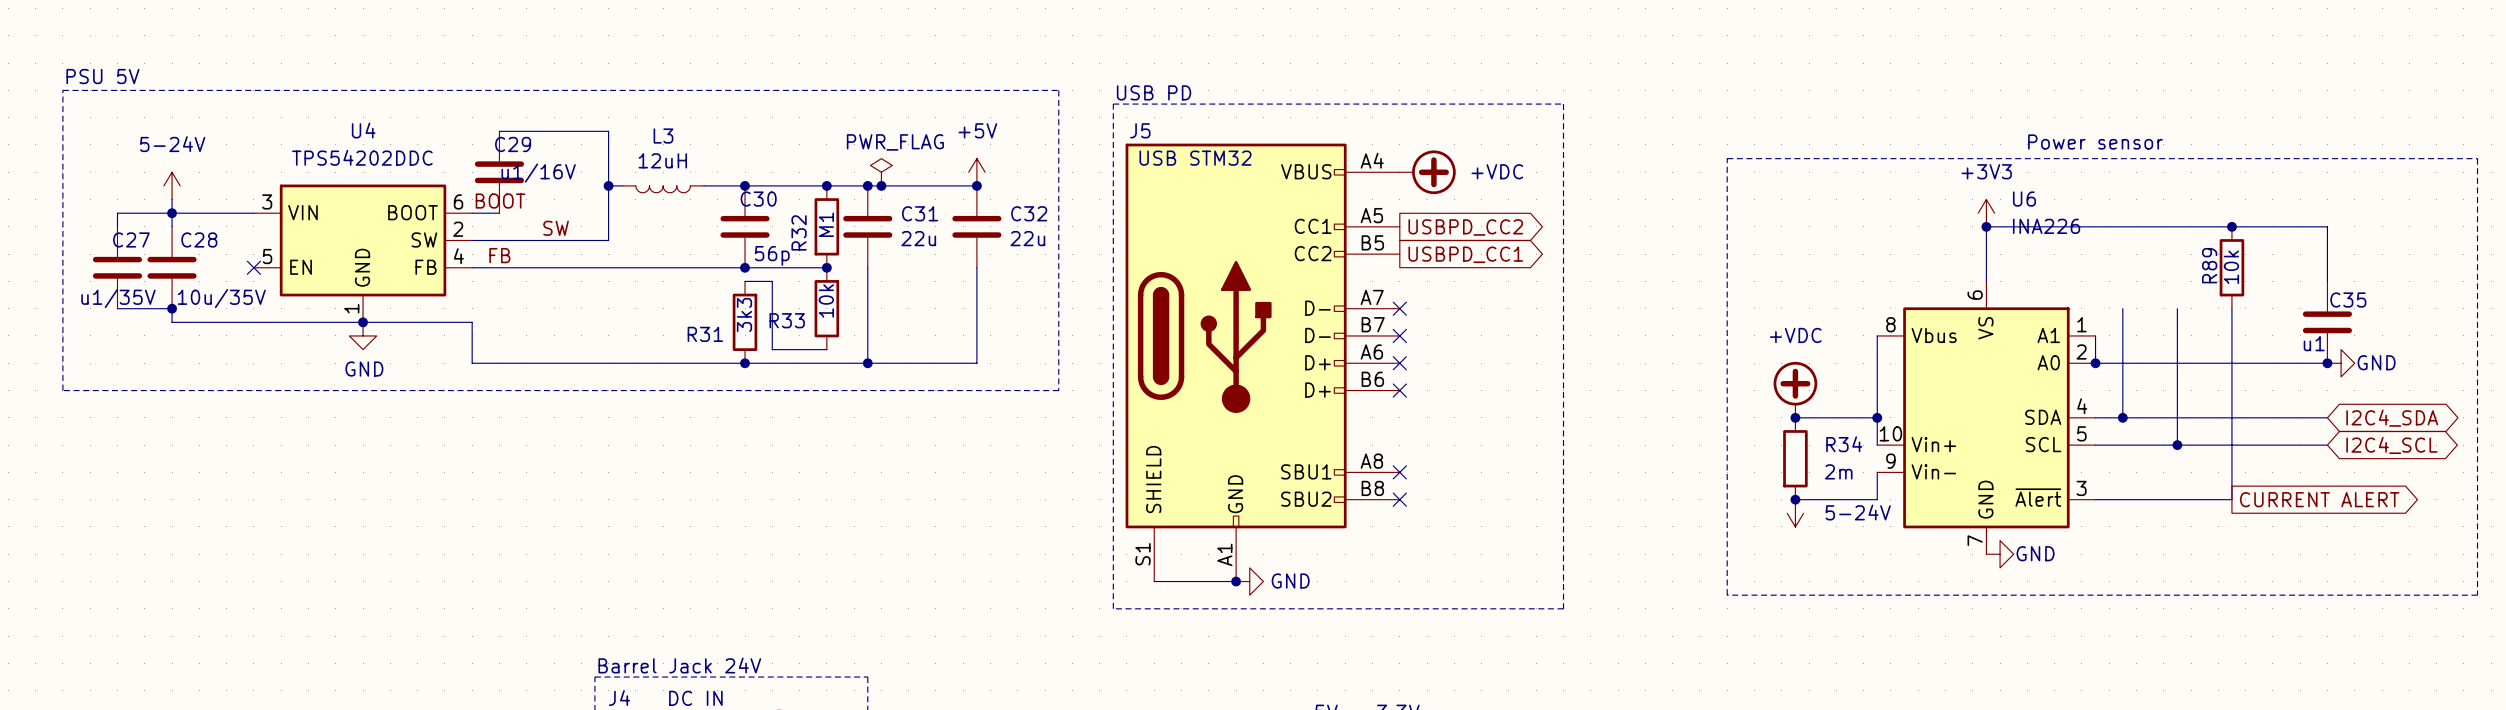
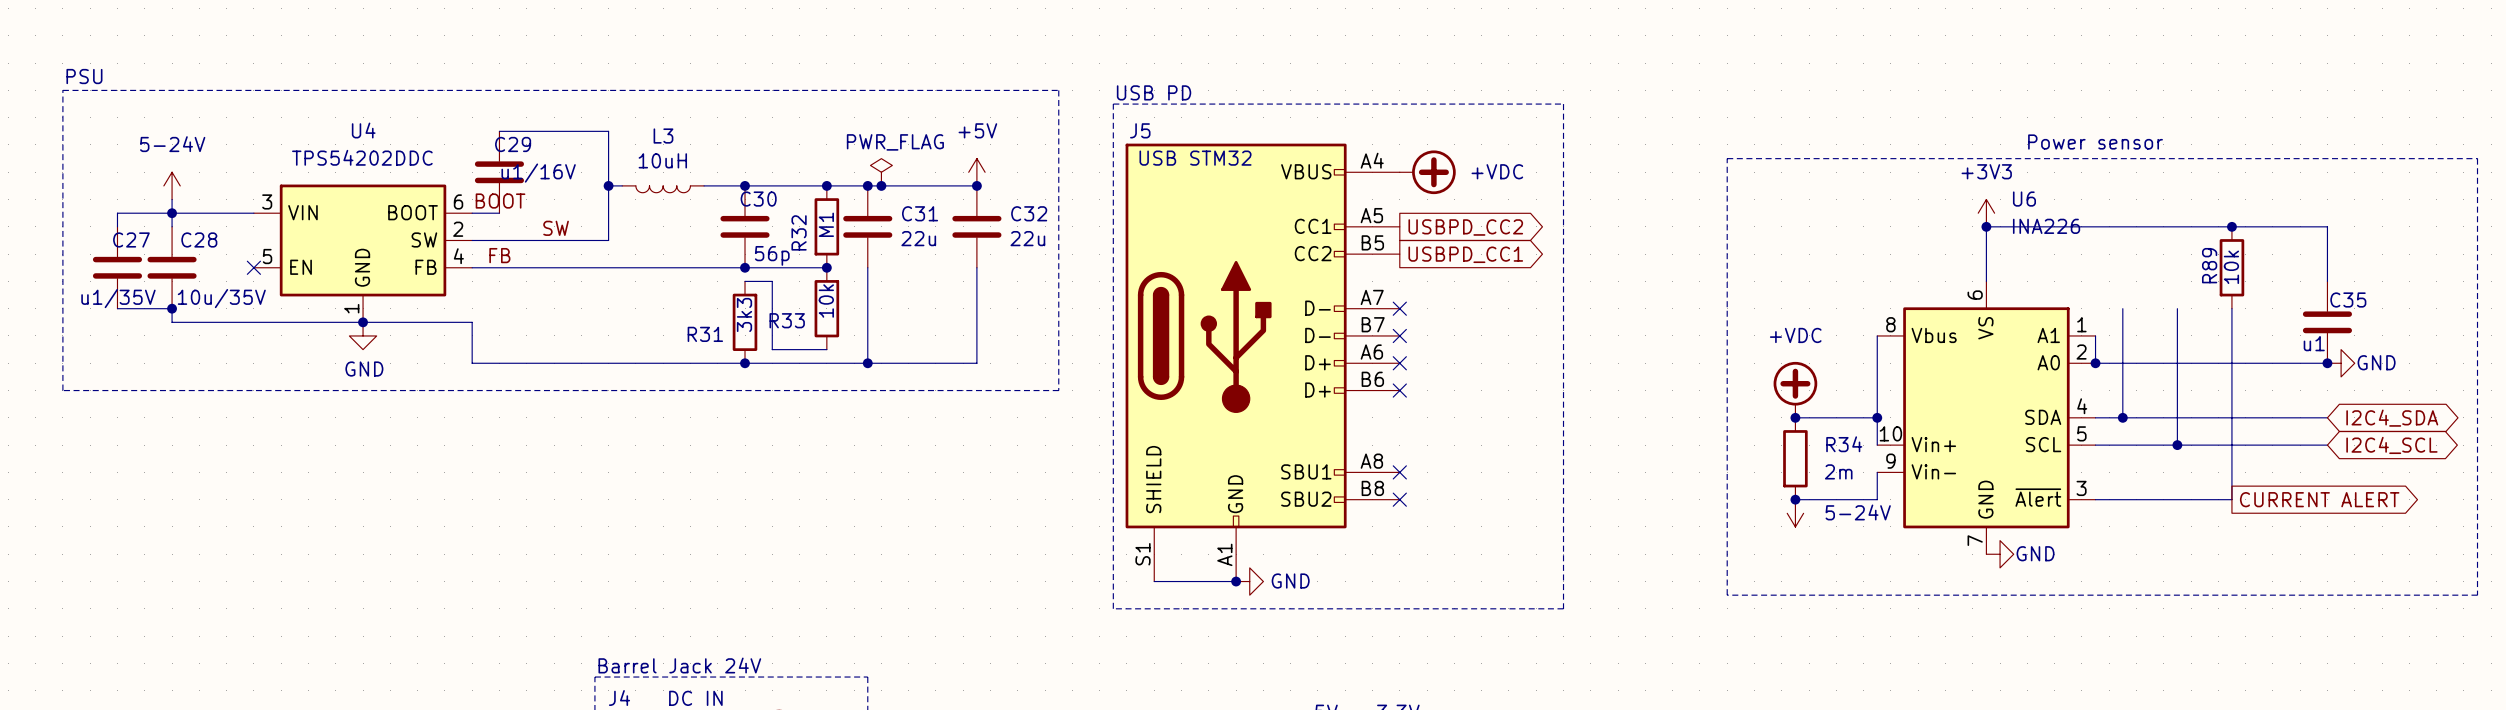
text: PSU 5V (102, 76) -> PSU (84, 76)
L3 value: 12uH (662, 160) -> 10uH (662, 160)

